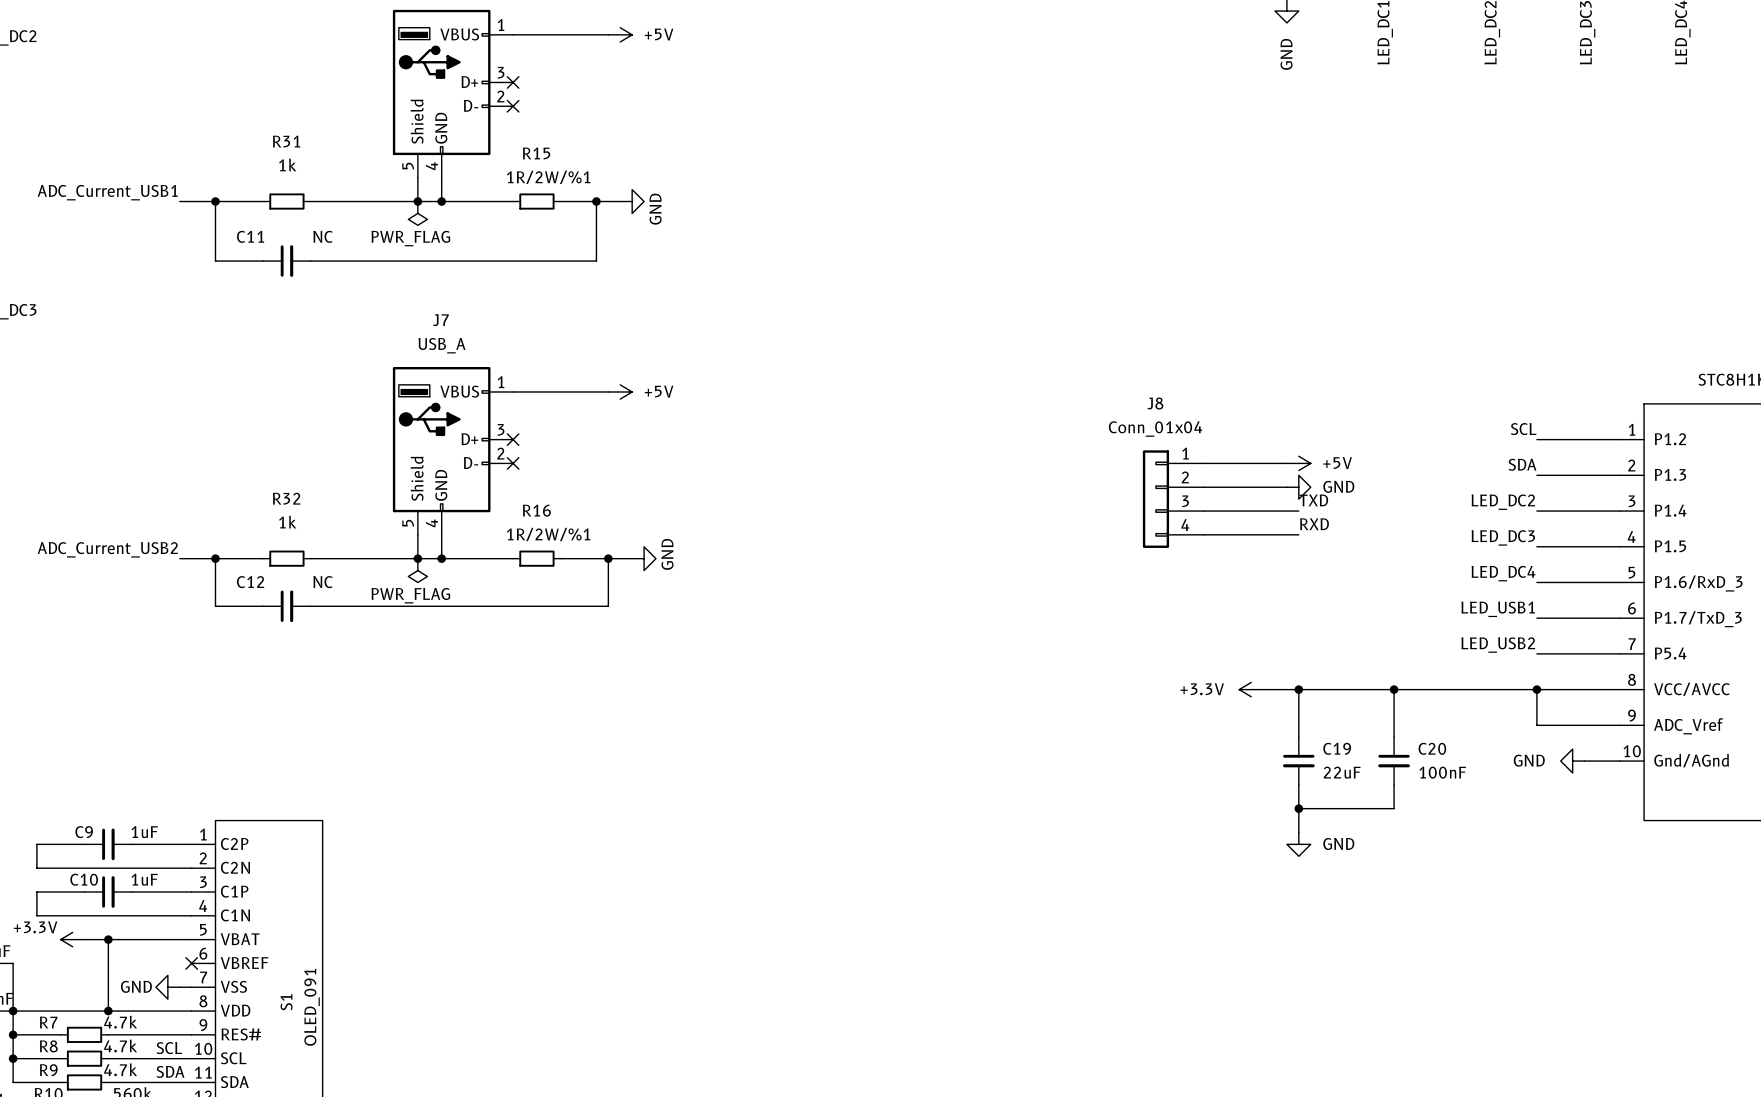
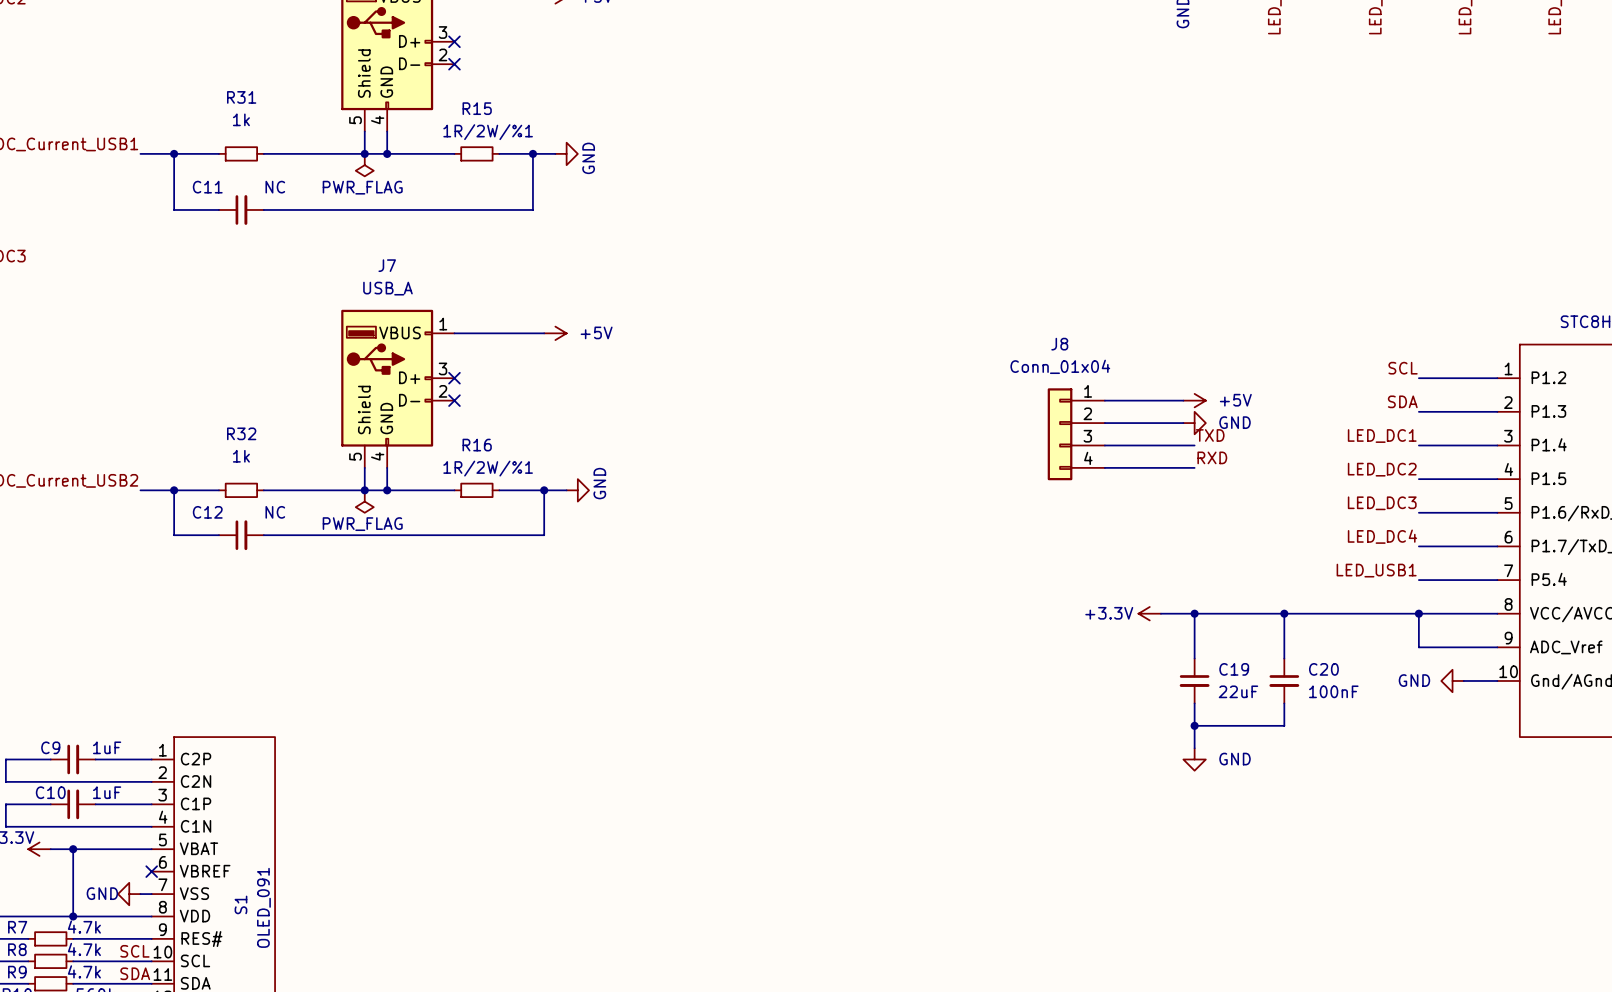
label: LED_DC2 (1503, 502) -> LED_DC1 (1382, 436)
label: LED_DC3 (1503, 537) -> LED_DC2 (1382, 469)
label: LED_DC4 (1503, 573) -> LED_DC3 (1382, 503)
label: LED_USB1 (1498, 609) -> LED_DC4 (1382, 536)
label: LED_USB2 (1498, 645) -> LED_USB1 (1376, 570)

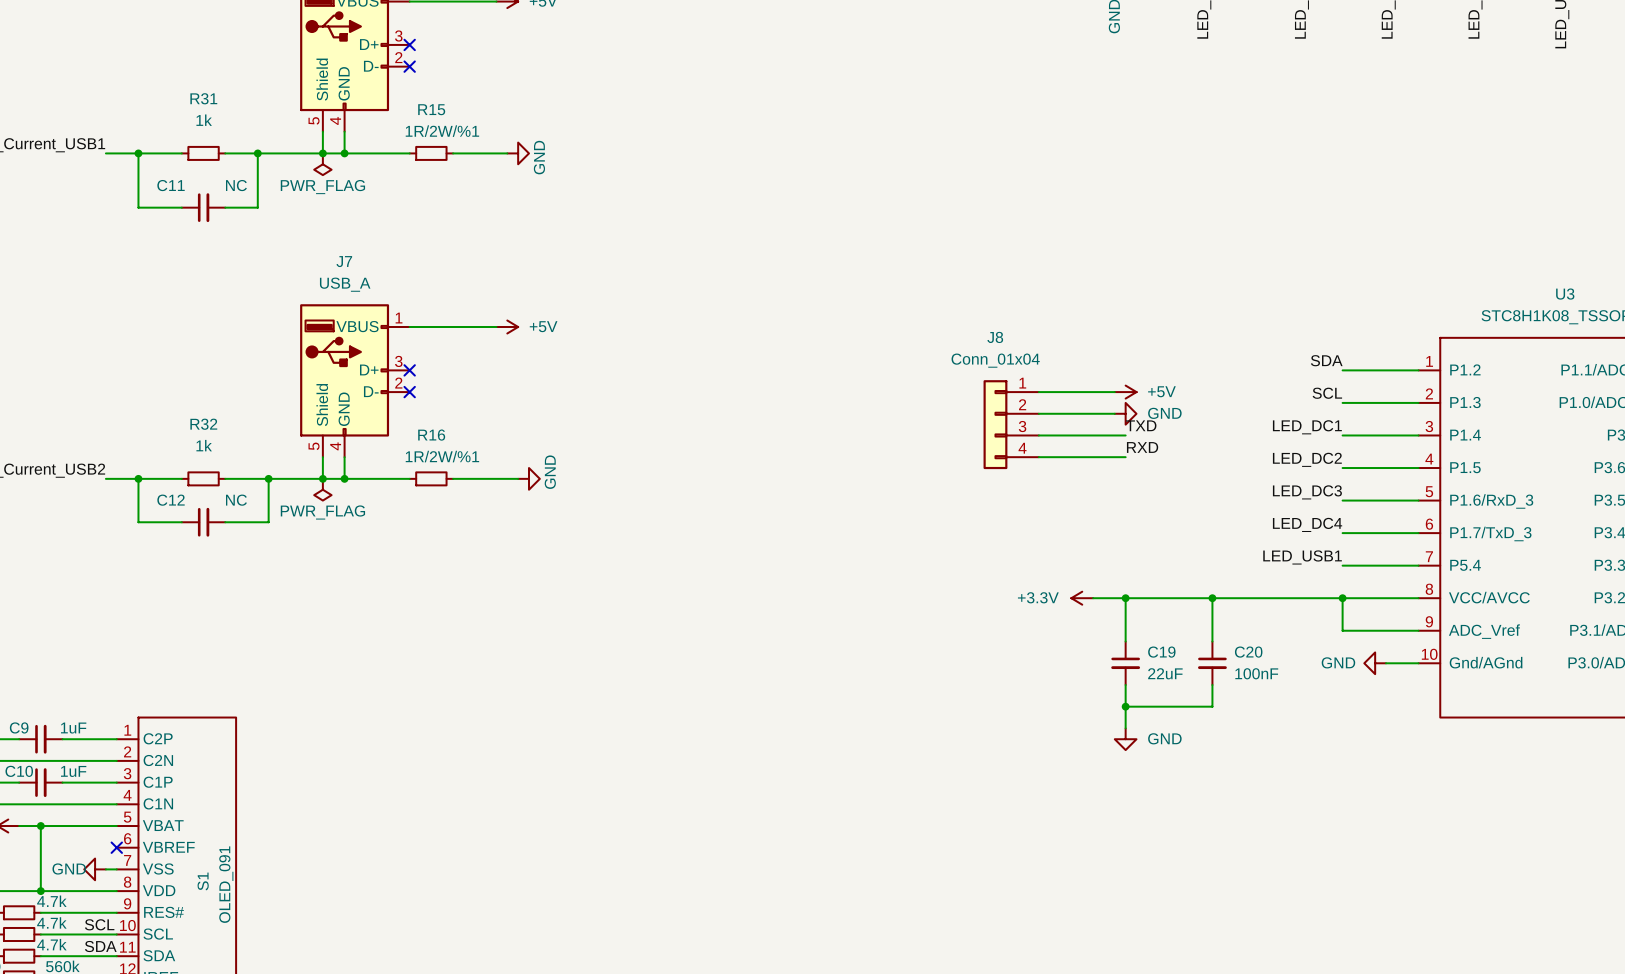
junction: none -> (257, 153)
wire: (532, 153) (532, 209) (297, 209) -> (257, 153) (257, 207)
junction: (532, 153) -> none
label: SCL (1403, 368) -> SDA (1326, 360)
label: SDA (1402, 401) -> SCL (1327, 393)
junction: none -> (268, 478)
wire: (544, 490) (544, 535) (308, 535) -> (268, 478) (268, 522)
junction: (544, 490) -> none

